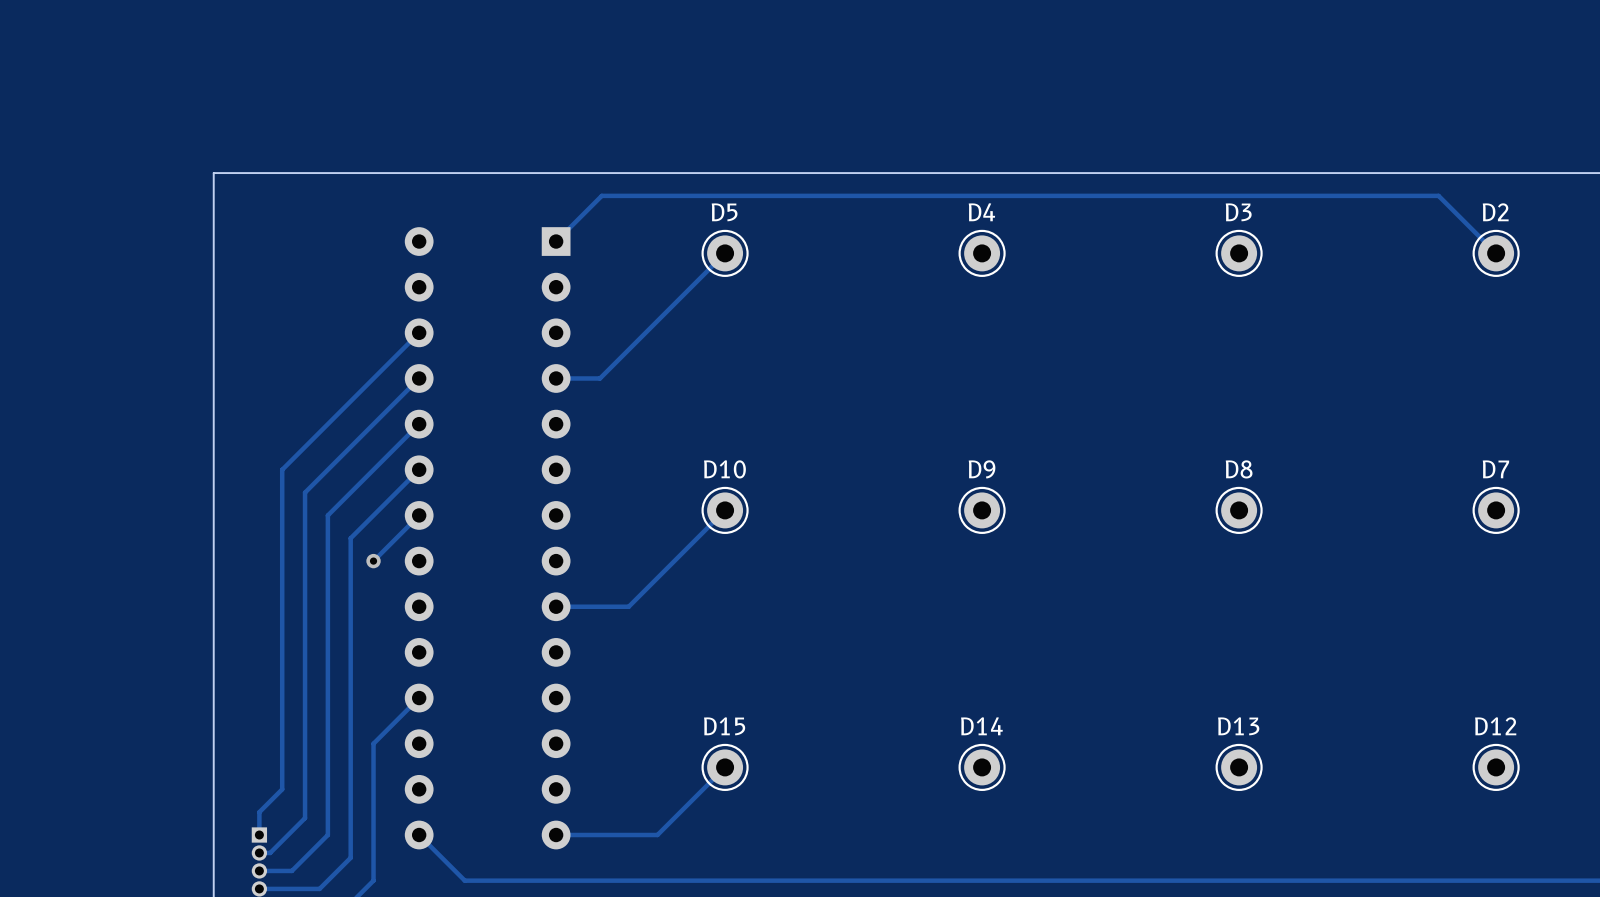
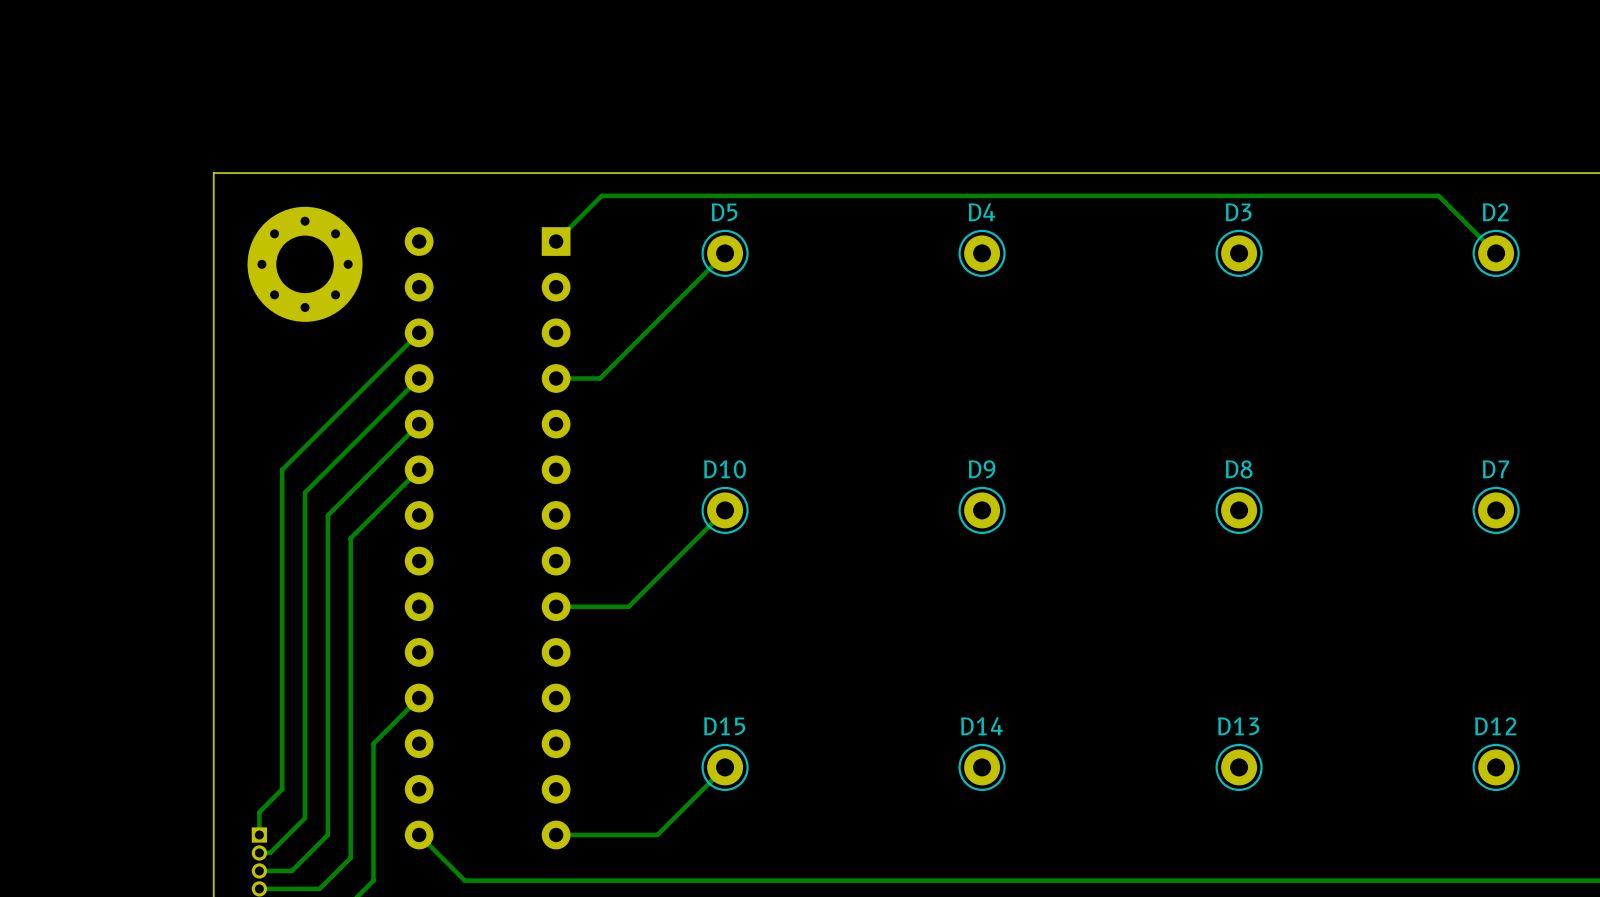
part: none -> (305, 264)
track: (419, 515) (373, 561) -> none
via: (373, 561) -> none

